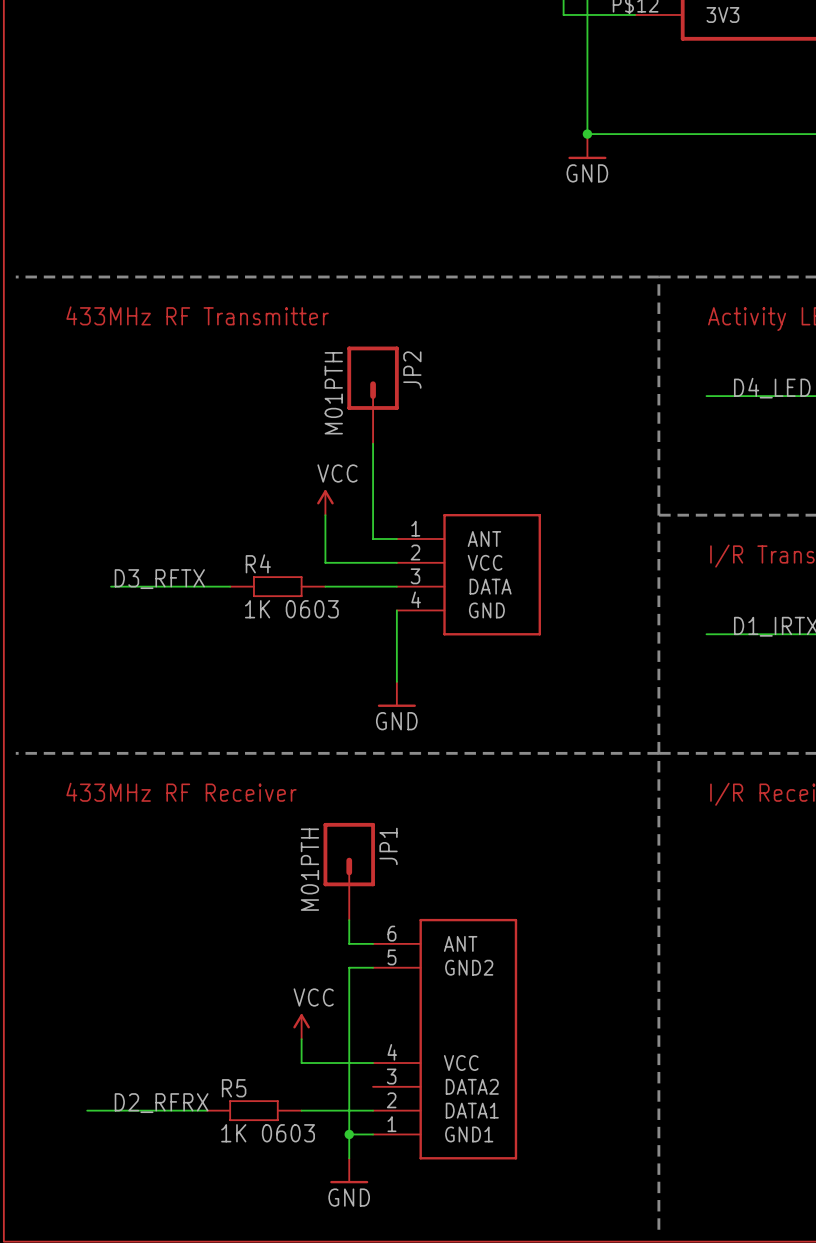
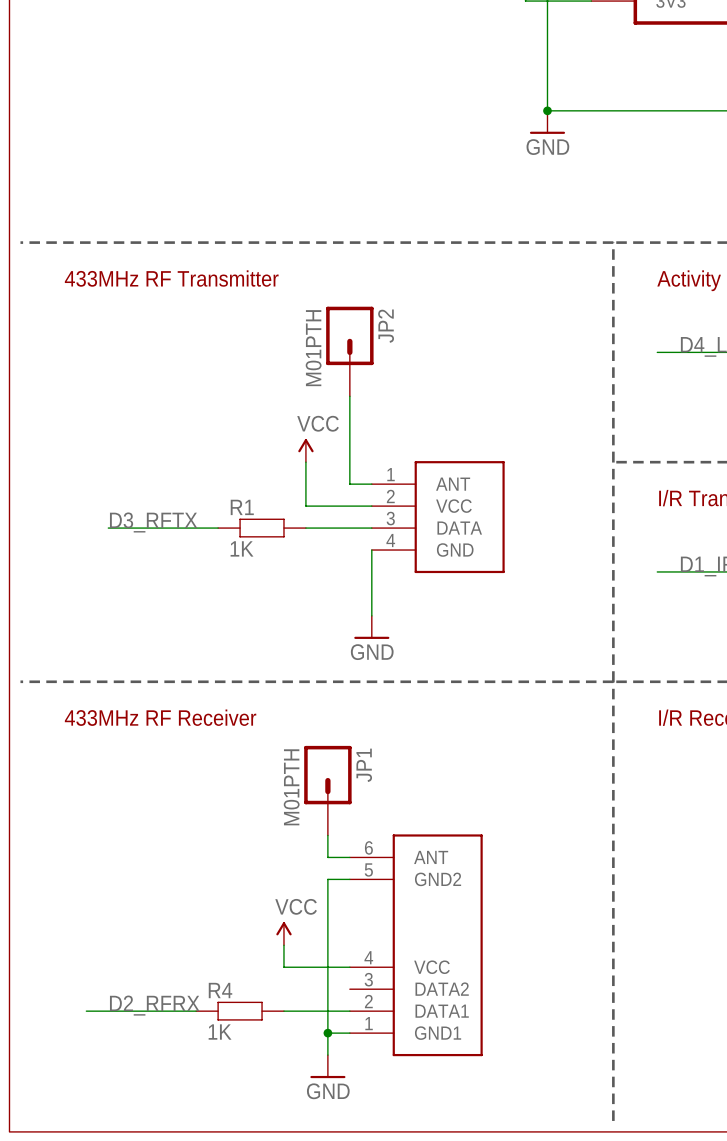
R4 name: R4 (258, 563) -> R1 (242, 507)
R4 value: 1K 0603 (291, 609) -> 1K (242, 548)
R5 name: R5 (234, 1088) -> R4 (220, 990)
R5 value: 1K 0603 (268, 1133) -> 1K (220, 1032)

